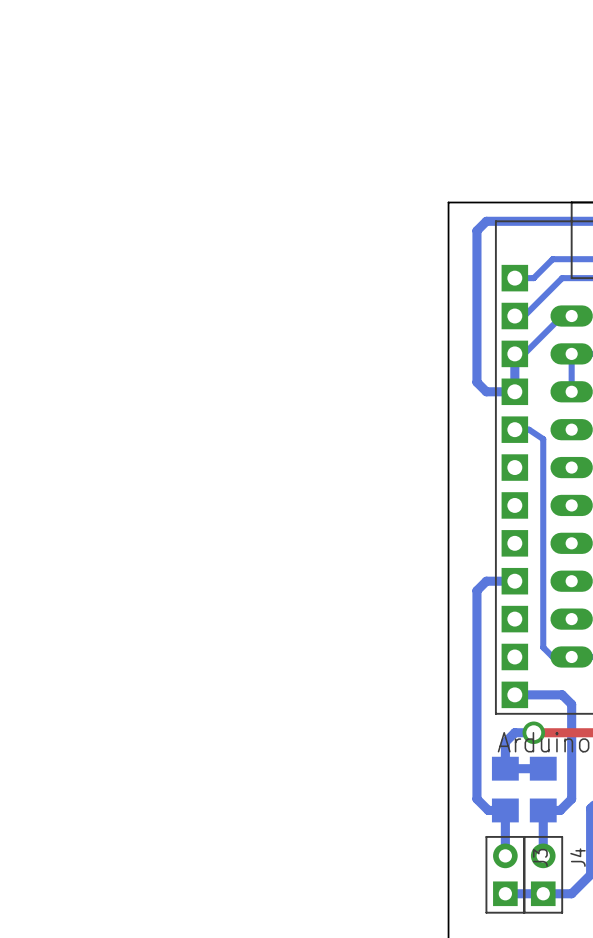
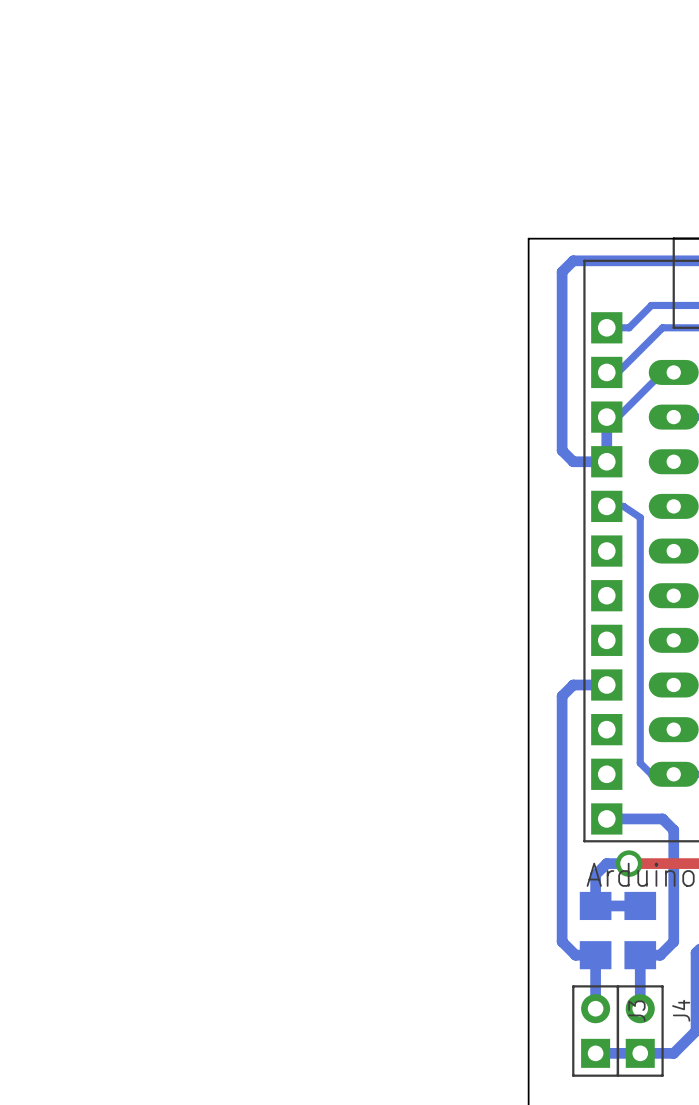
bottom track: (571, 353) (571, 391) -> none

